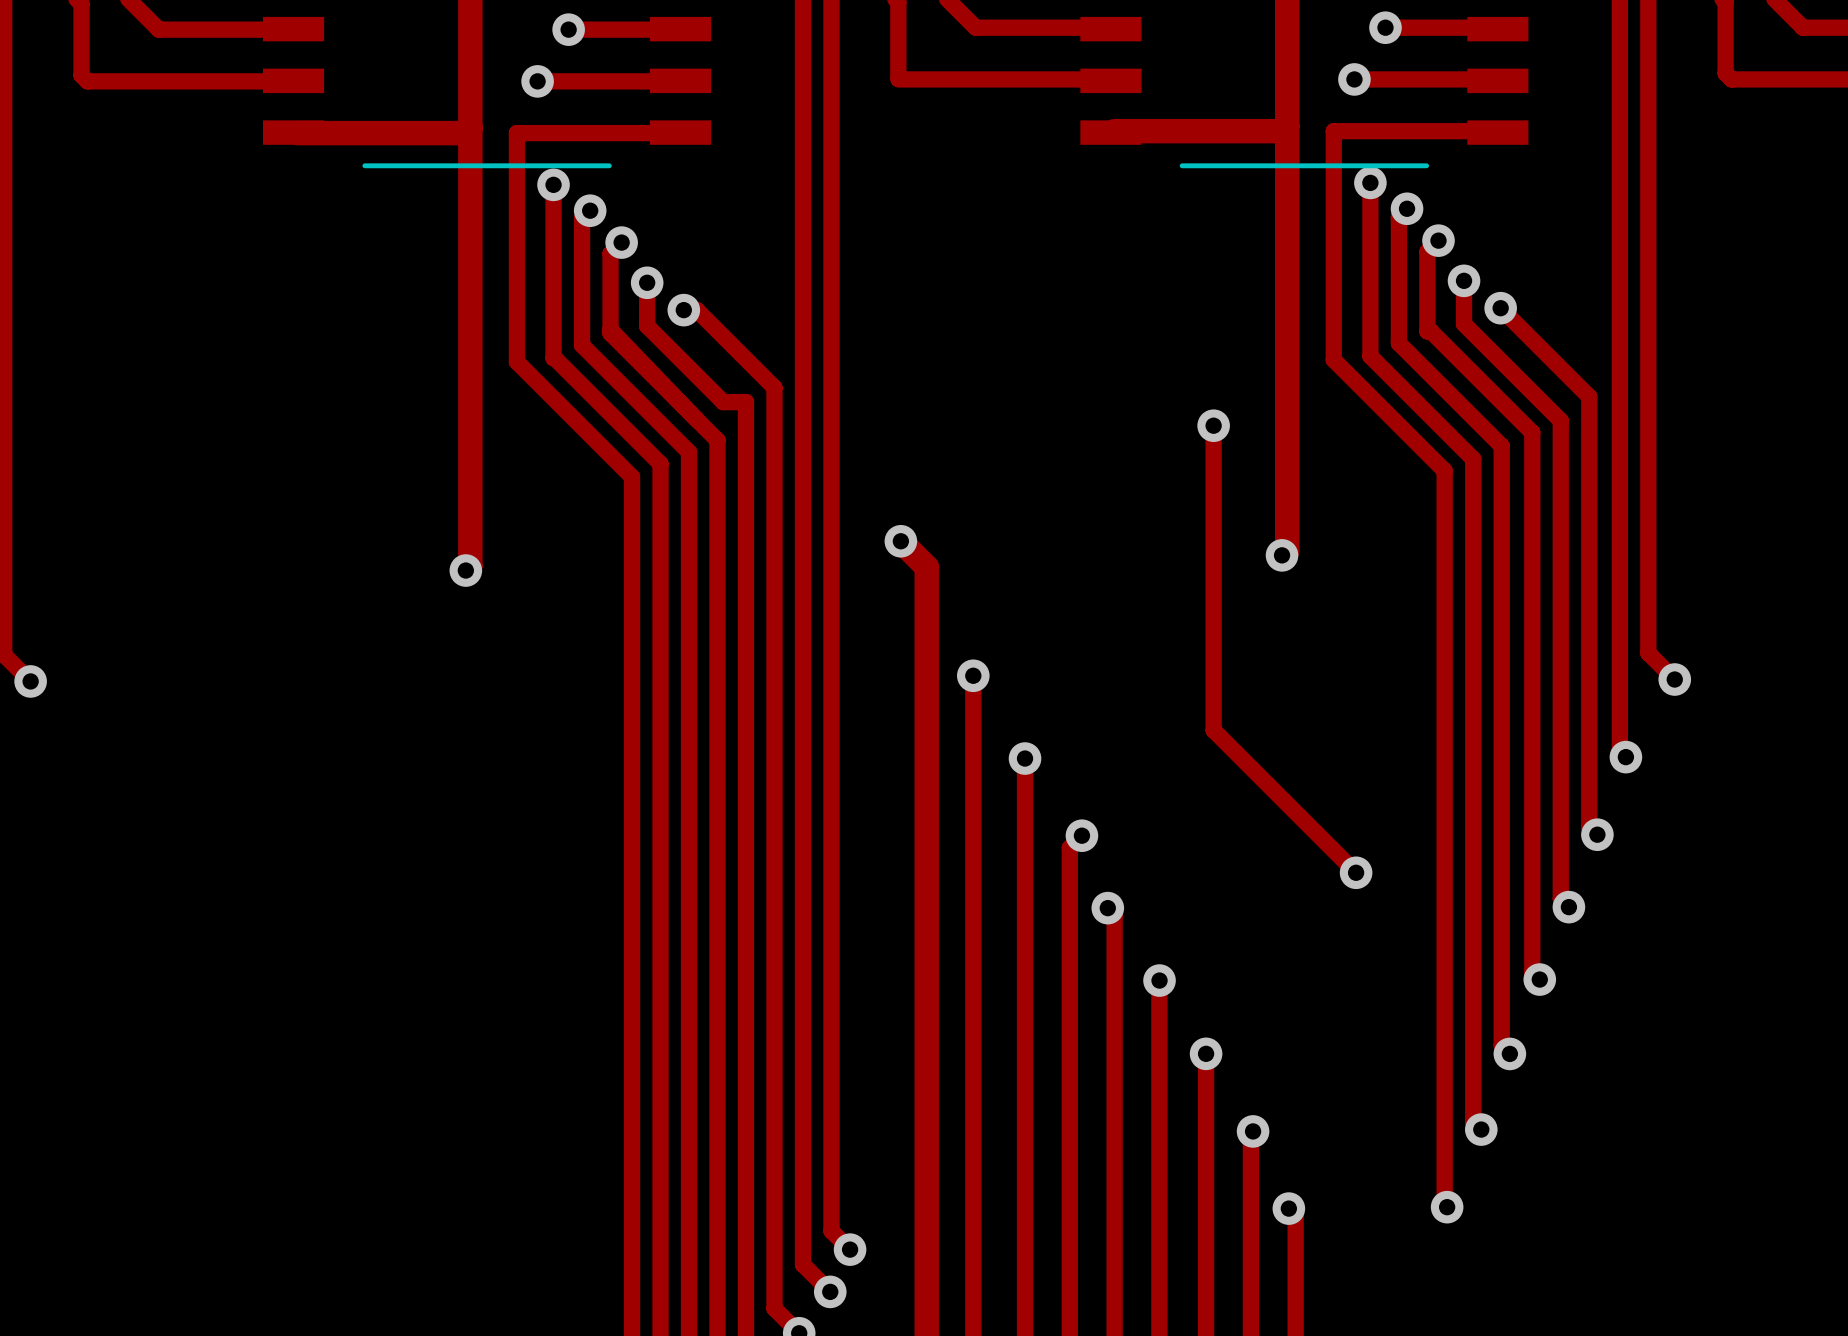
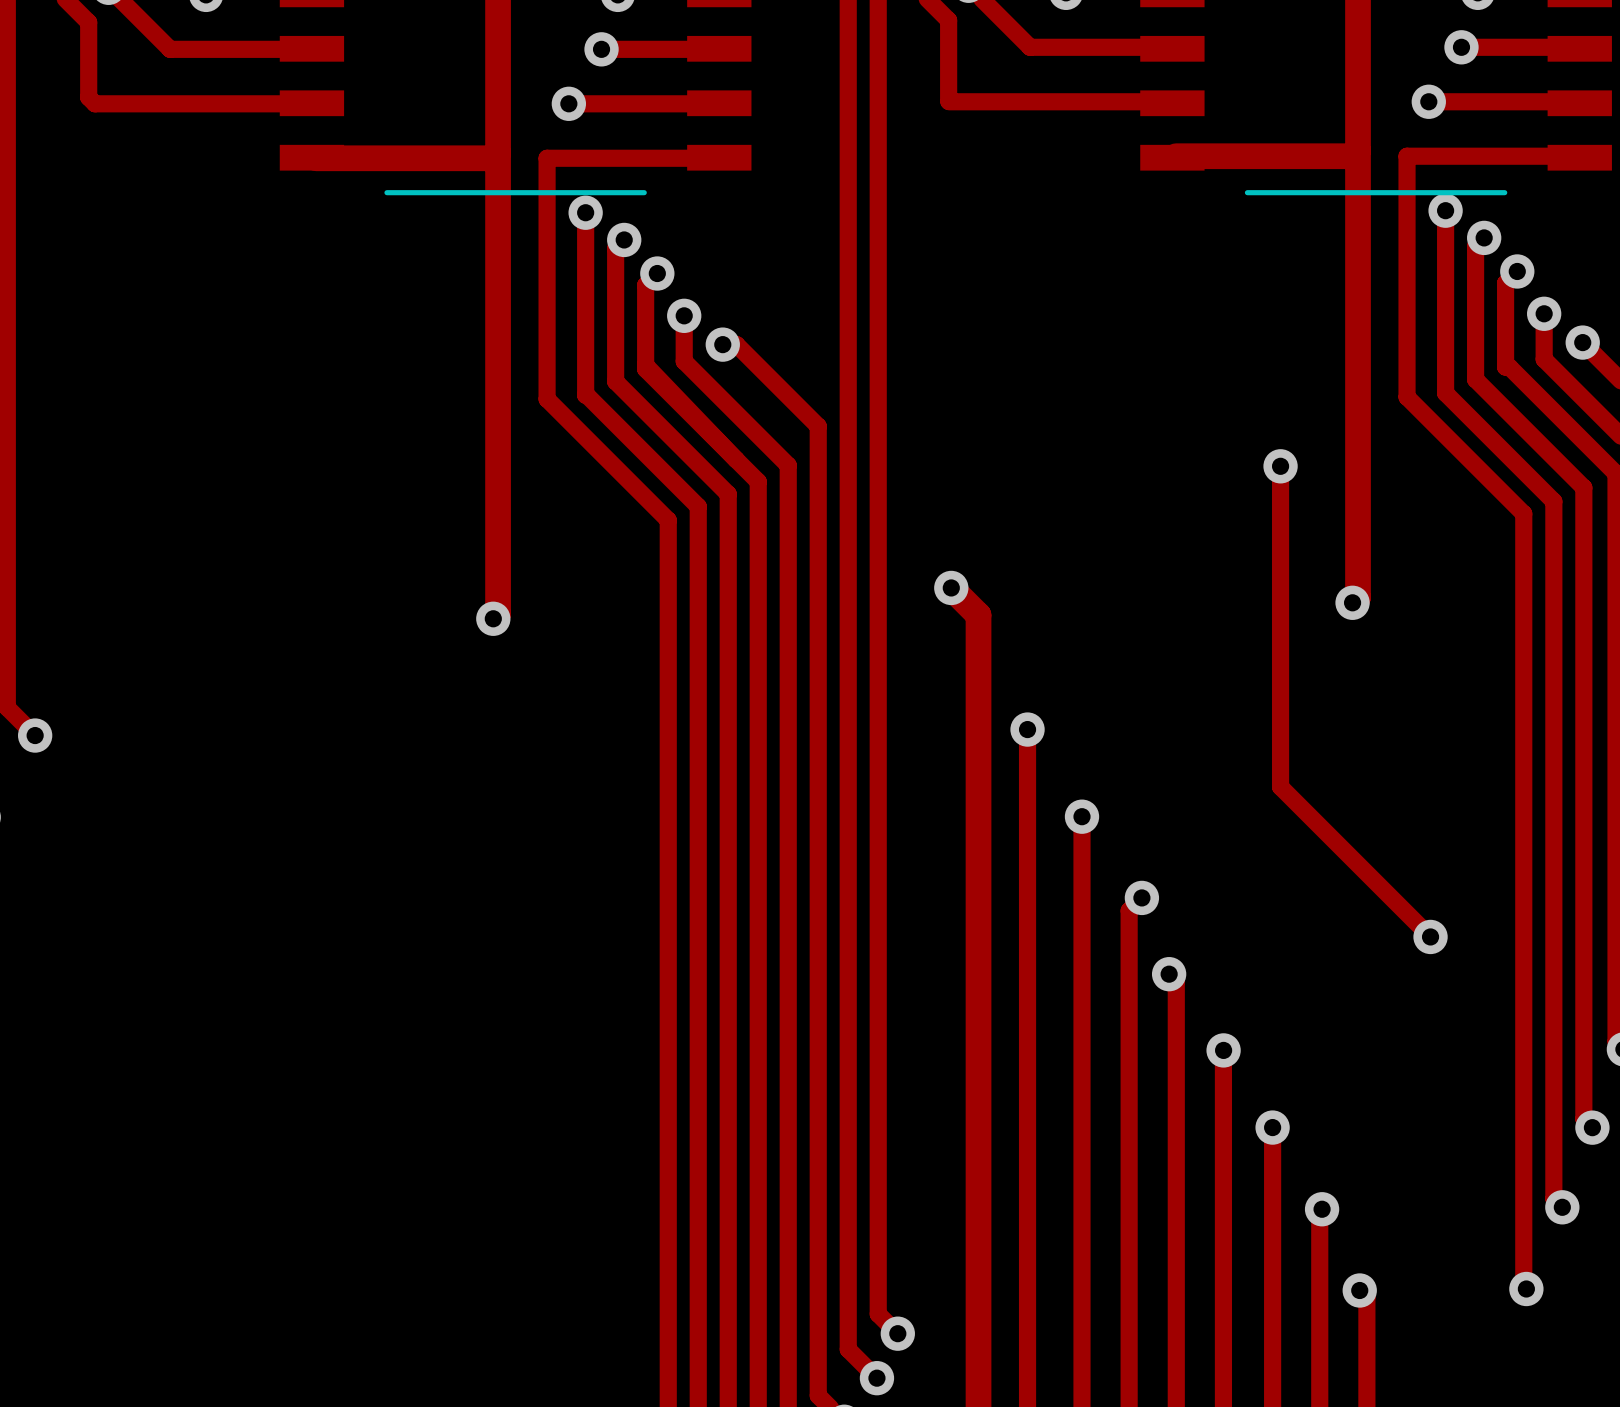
track: (723, 402) (745, 402) (745, 424) -> (764, 441) (788, 465)

